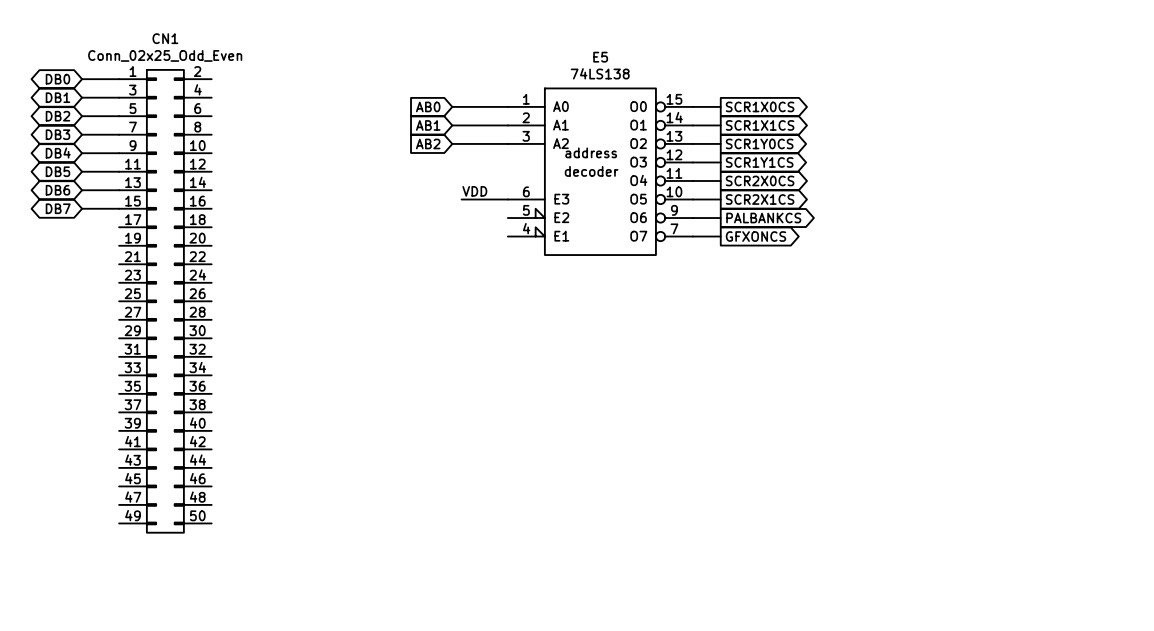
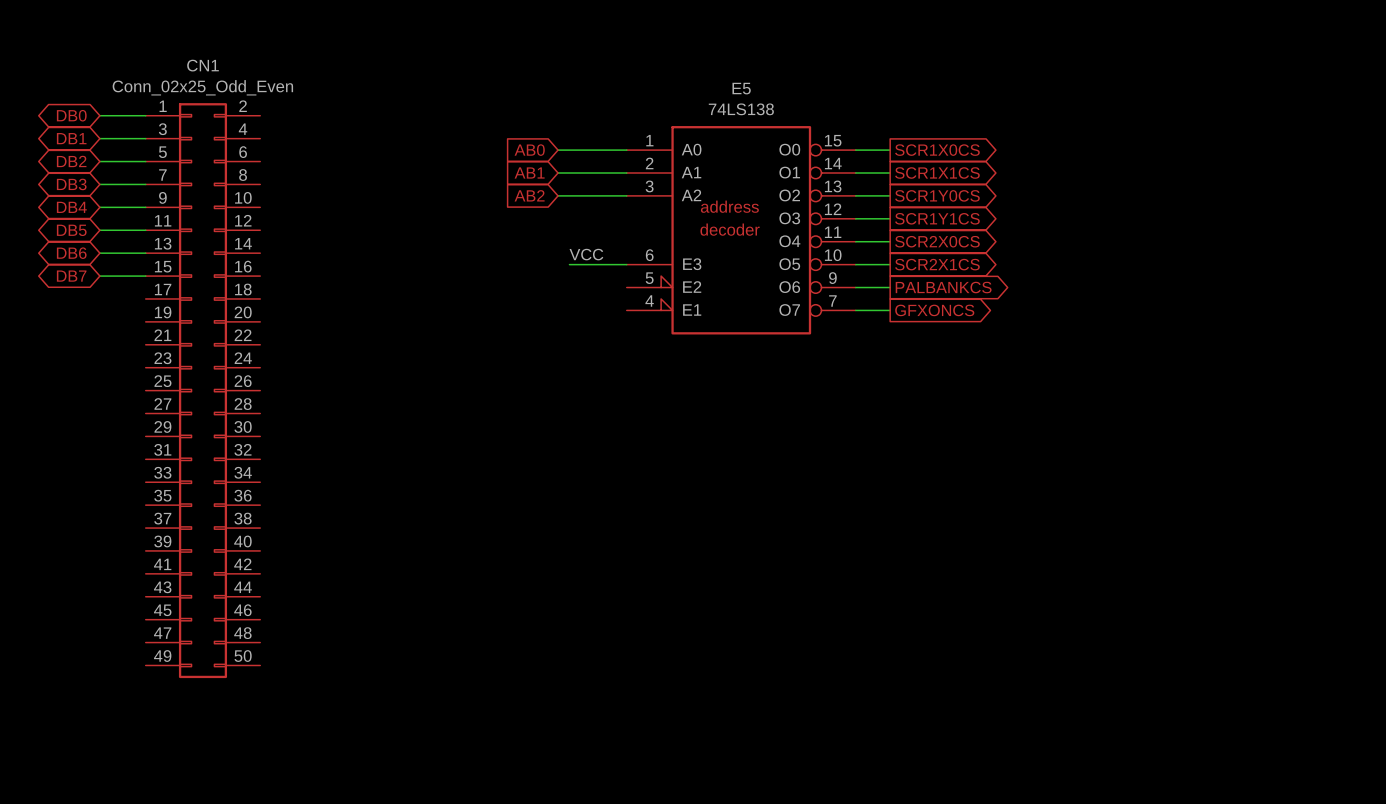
label: VDD (474, 191) -> VCC (586, 254)

